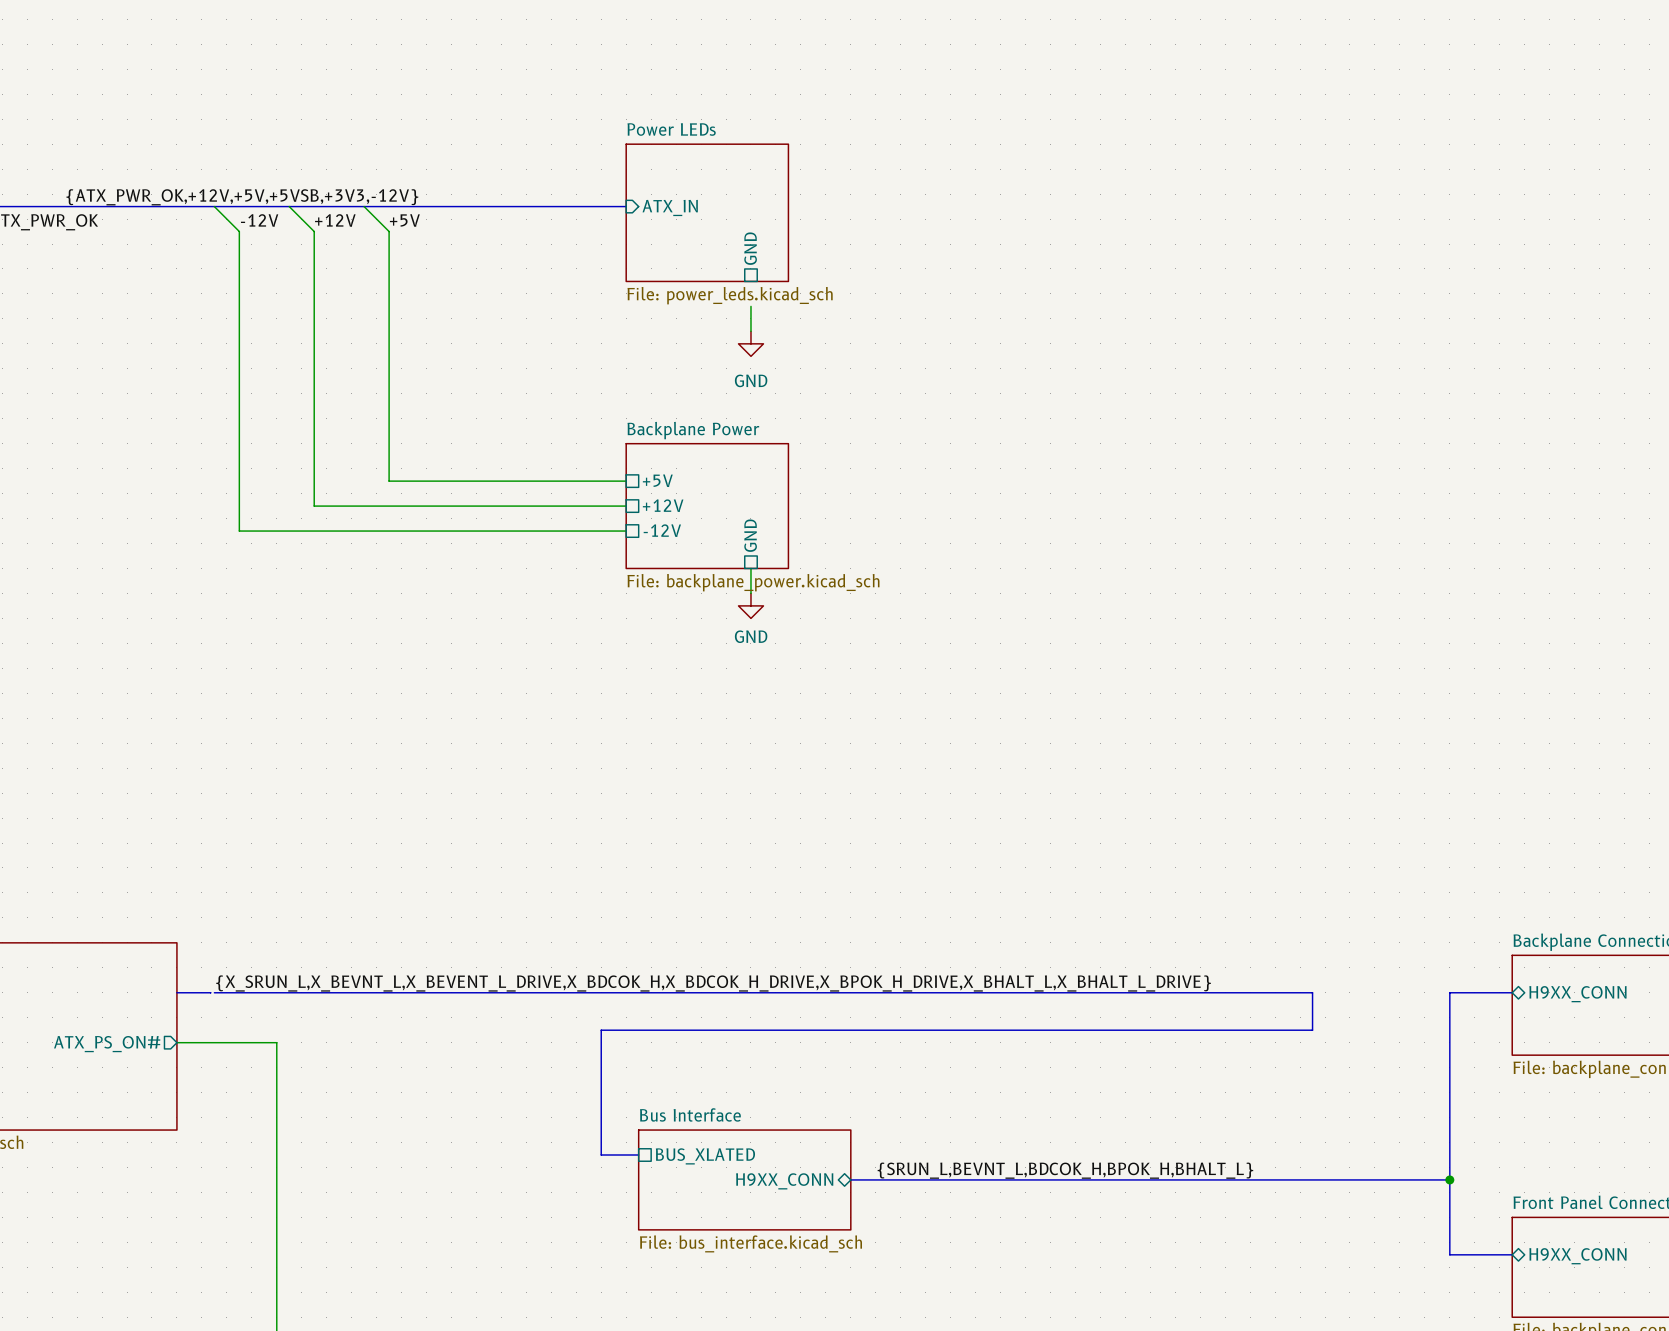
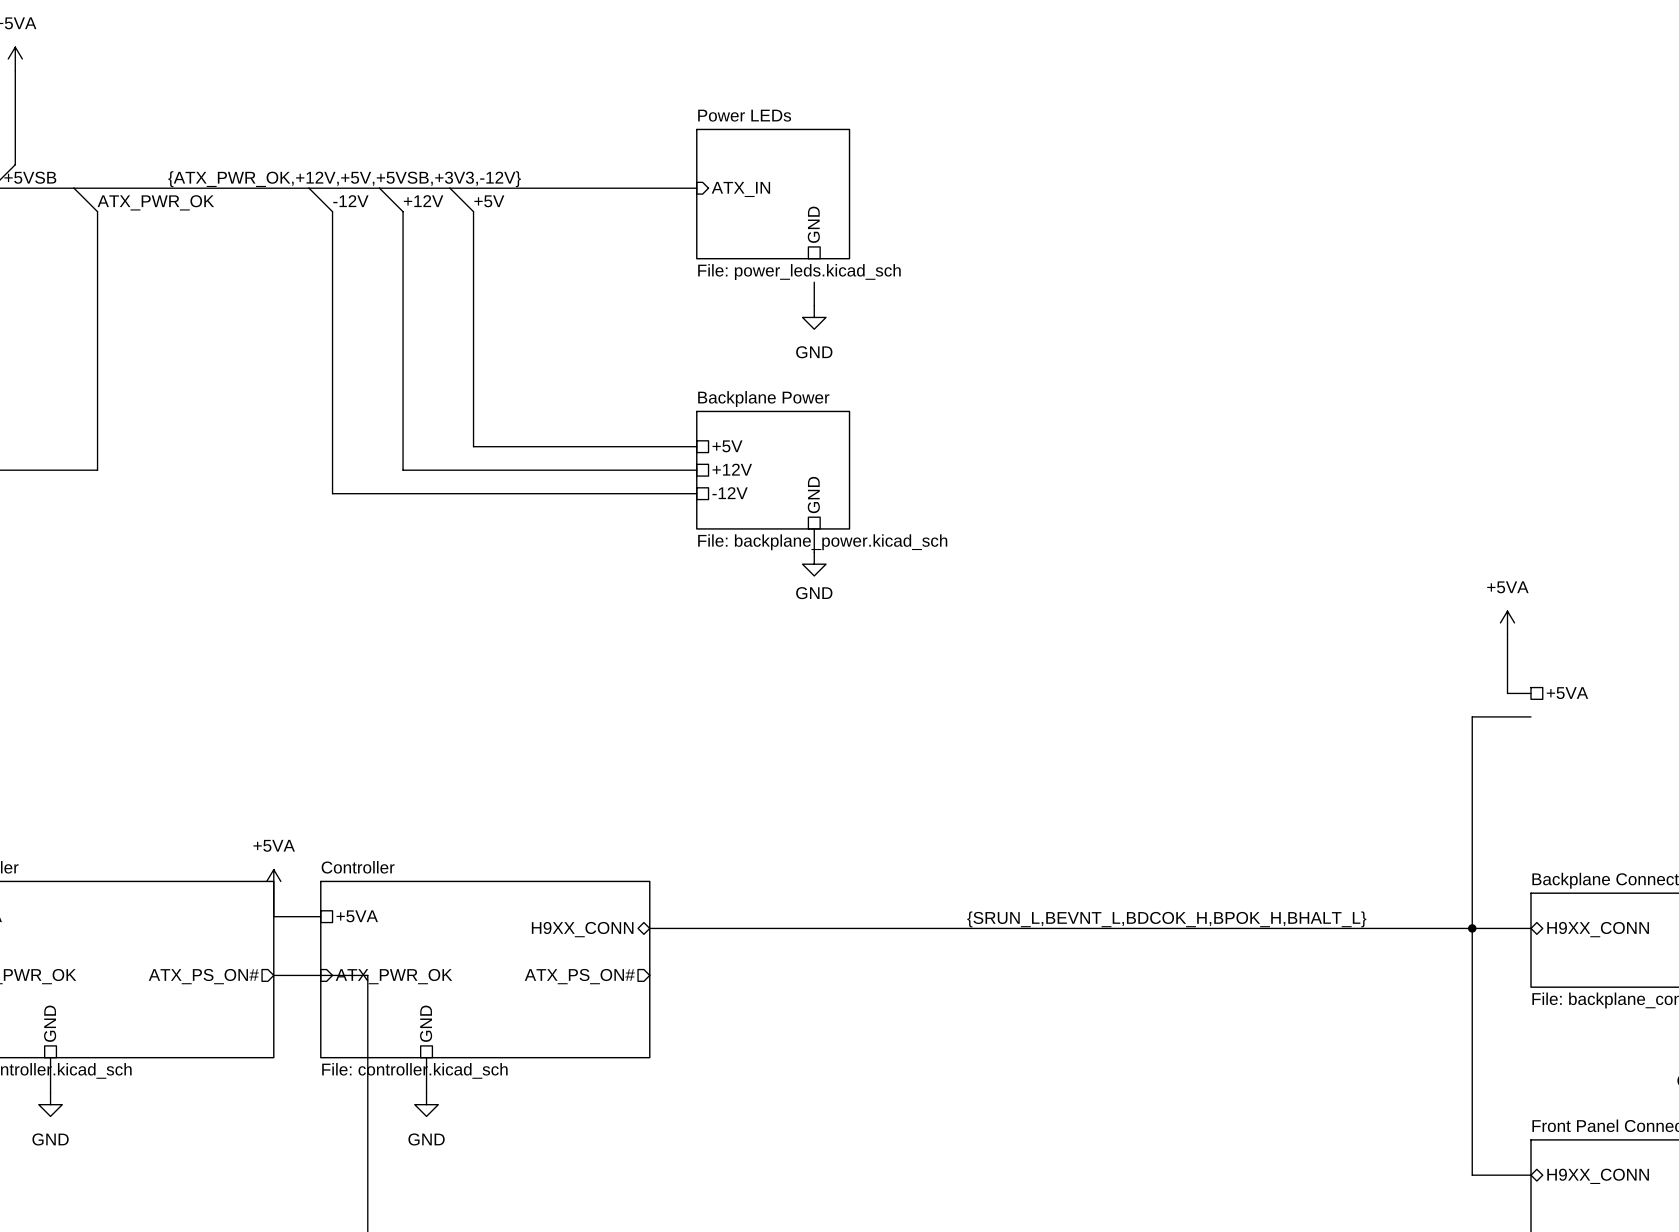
power symbol: none -> +5VA (1507, 622)
wire: none -> (1507, 634) (1507, 693) (1531, 693)
sheet pin: none -> +5VA (1567, 693)
power symbol: none -> +5VA (273, 881)
wire: none -> (273, 893) (273, 916) (320, 916)
sheet pin: none -> +5VA (357, 916)
label: {X_SRUN_L,X_BEVNT_L,X_BEVENT_L_DRIVE,X_BDCOK_H,X_BDCOK_H_DRIVE,X_BPOK_H_DRIVE,X_BHALT_L,X_BHALT_L_DRIVE} (713, 983) -> none
bus: (176, 992) (210, 992) -> none
bus: (214, 992) (576, 992) -> none
bus: (1312, 992) (1312, 1030) (601, 1030) (601, 1155) (638, 1155) -> (1343, 928) (1472, 928) (1472, 716) (1531, 716)
junction: none -> (1472, 928)
sheet pin: none -> H9XX_CONN (582, 929)
sheet Controller: none -> File: controller.kicad_sch (485, 969)
sheet pin: none -> ATX_PWR_OK (394, 976)
sheet pin: none -> ATX_PS_ON# (579, 976)
sheet pin: none -> GND (426, 1023)
wire: none -> (426, 1057) (426, 1092)
sheet pin: BUS_XLATED (705, 1156) -> none
label position: {SRUN_L,BEVNT_L,BDCOK_H,BPOK_H,BHALT_L} (1065, 1170) -> {SRUN_L,BEVNT_L,BDCOK_H,BPOK_H,BHALT_L} (1166, 919)
power symbol: none -> GND (426, 1104)
sheet Bus Interface: File: bus_interface.kicad_sch (744, 1179) -> none
bus: (850, 1179) (1449, 1179) -> none
junction: (1449, 1179) -> none
sheet pin: H9XX_CONN (784, 1181) -> none

